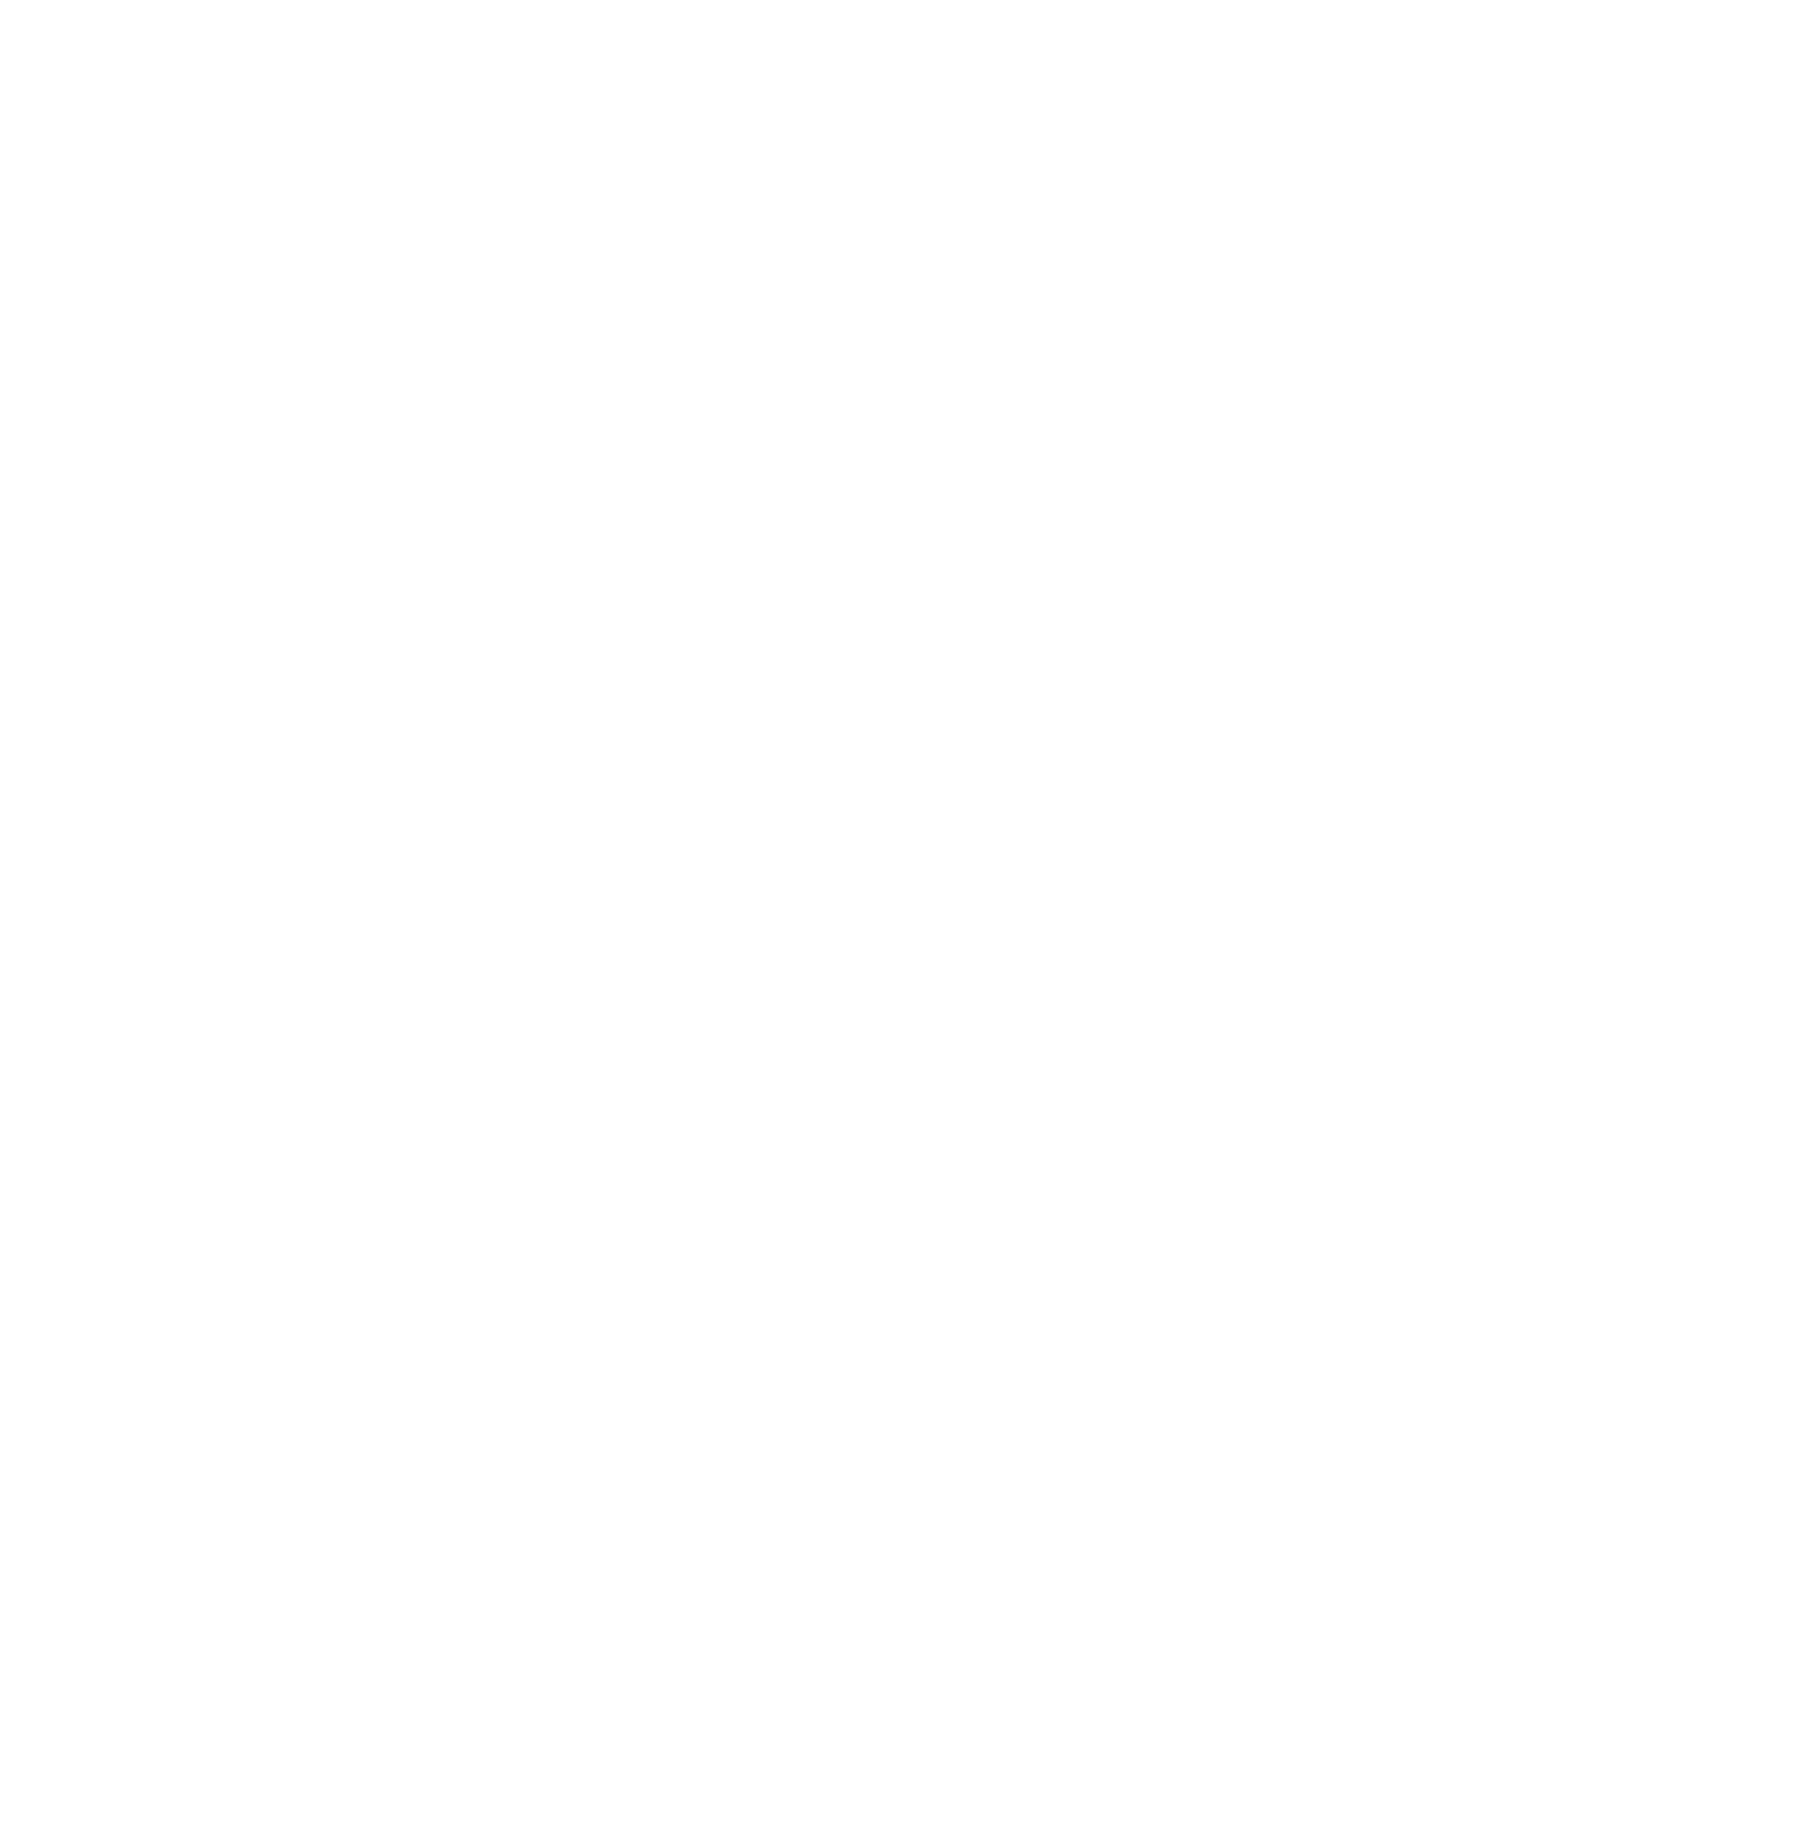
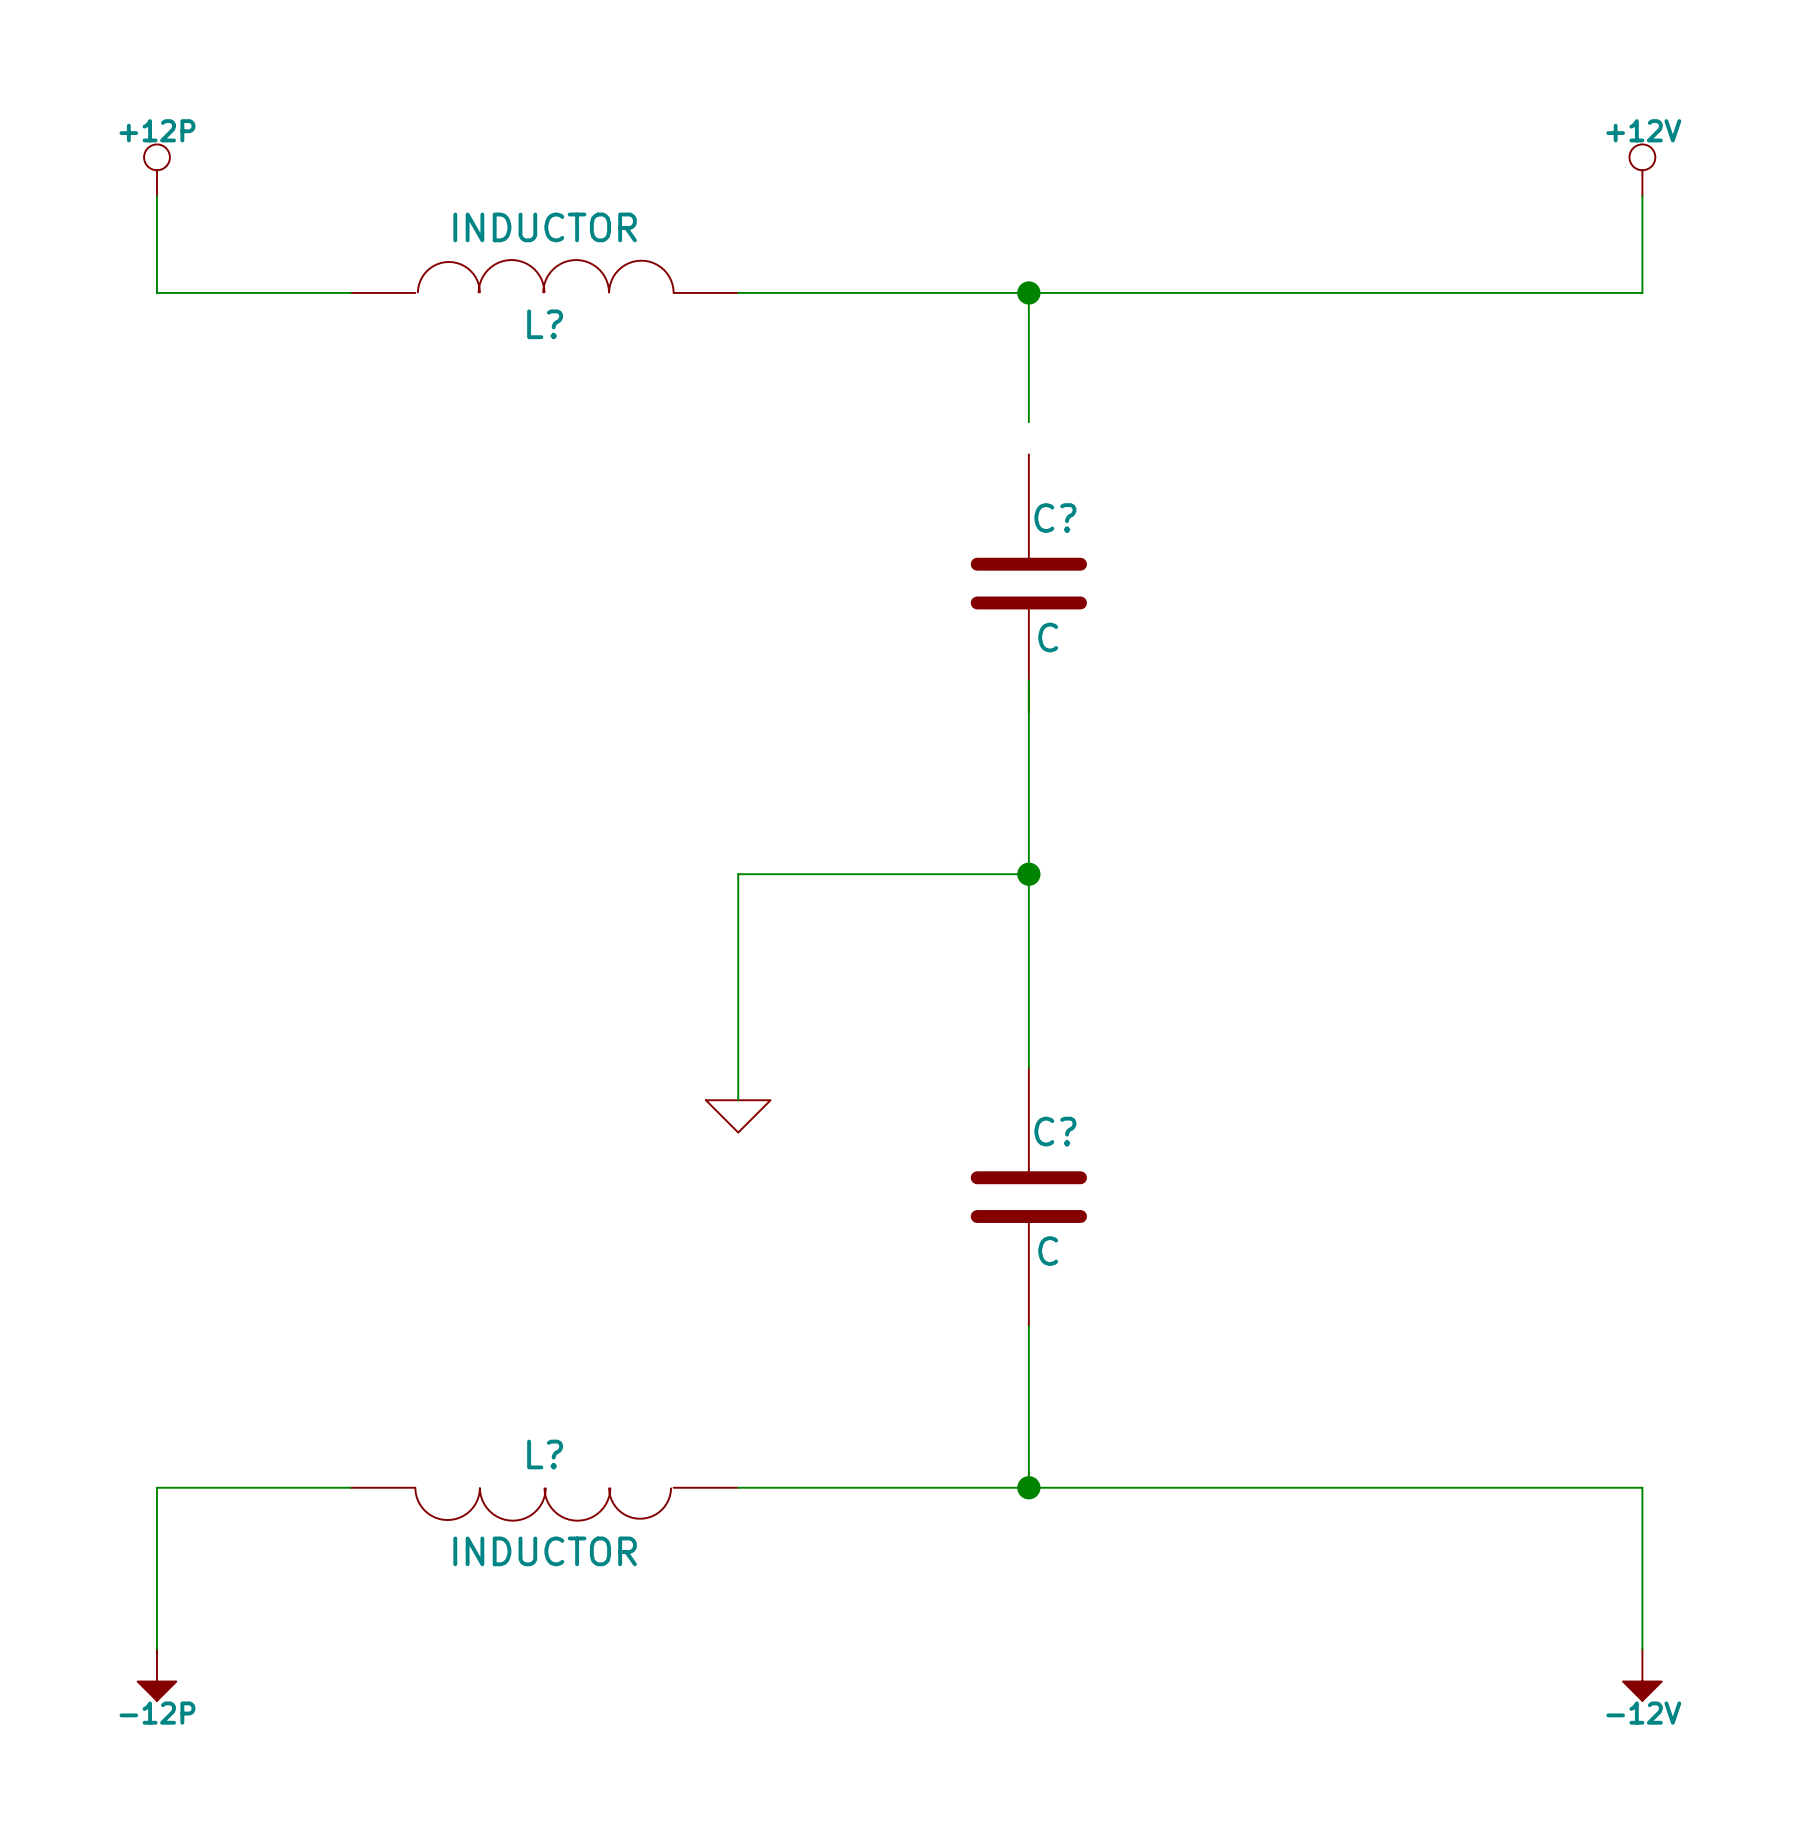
power symbol: none -> +12P (156, 170)
power symbol: none -> +12V (1642, 170)
wire: none -> (156, 196) (156, 292) (350, 292)
wire: none -> (1642, 196) (1642, 292) (738, 292)
L?: none -> INDUCTOR (544, 276)
wire: none -> (1028, 292) (1028, 422)
junction: none -> (1028, 292)
C?: none -> C (1028, 583)
wire: none -> (1028, 680) (1028, 1067)
wire: none -> (1028, 874) (738, 874) (738, 1100)
junction: none -> (1028, 874)
power symbol: none -> (738, 1116)
C?: none -> C (1028, 1197)
wire: none -> (1028, 1326) (1028, 1487)
wire: none -> (350, 1487) (156, 1487) (156, 1649)
wire: none -> (738, 1487) (1642, 1487) (1642, 1649)
junction: none -> (1028, 1487)
L?: none -> INDUCTOR (544, 1504)
power symbol: none -> -12P (156, 1675)
power symbol: none -> -12V (1642, 1675)

